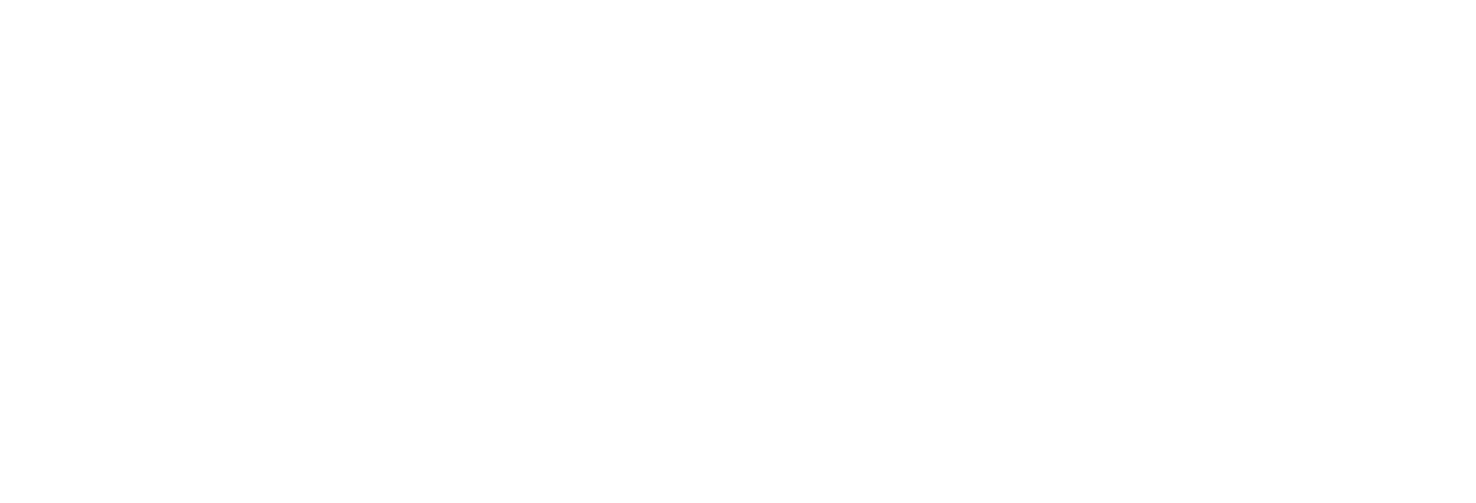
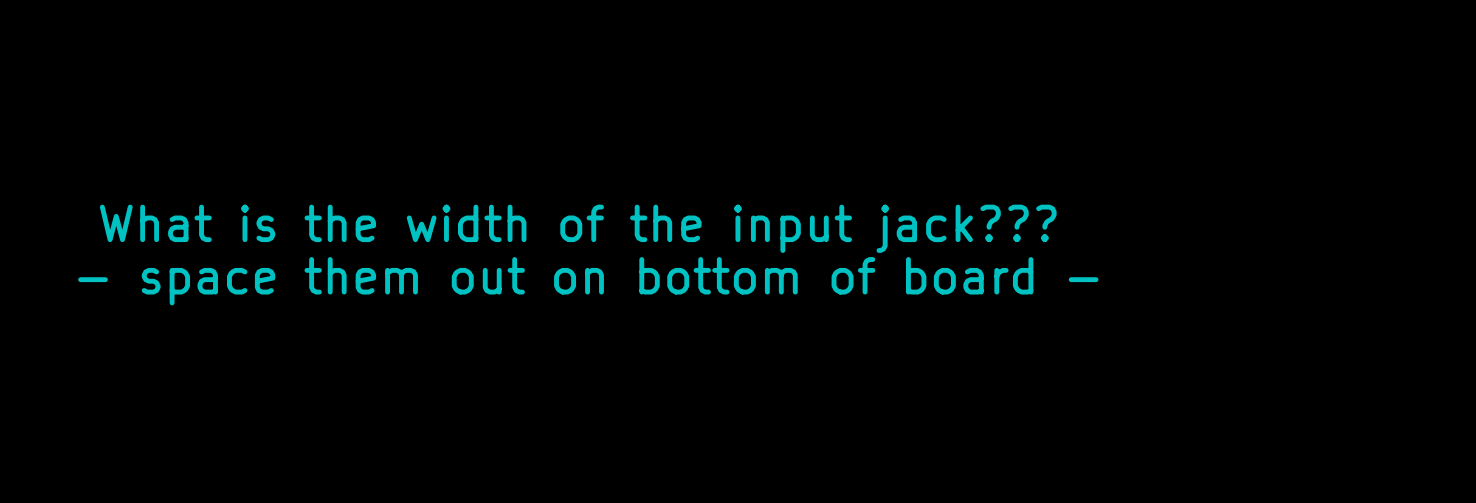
text: none -> What is the width of the input jack??? (578, 228)
text: none -> - space them out on bottom of board - (588, 281)

